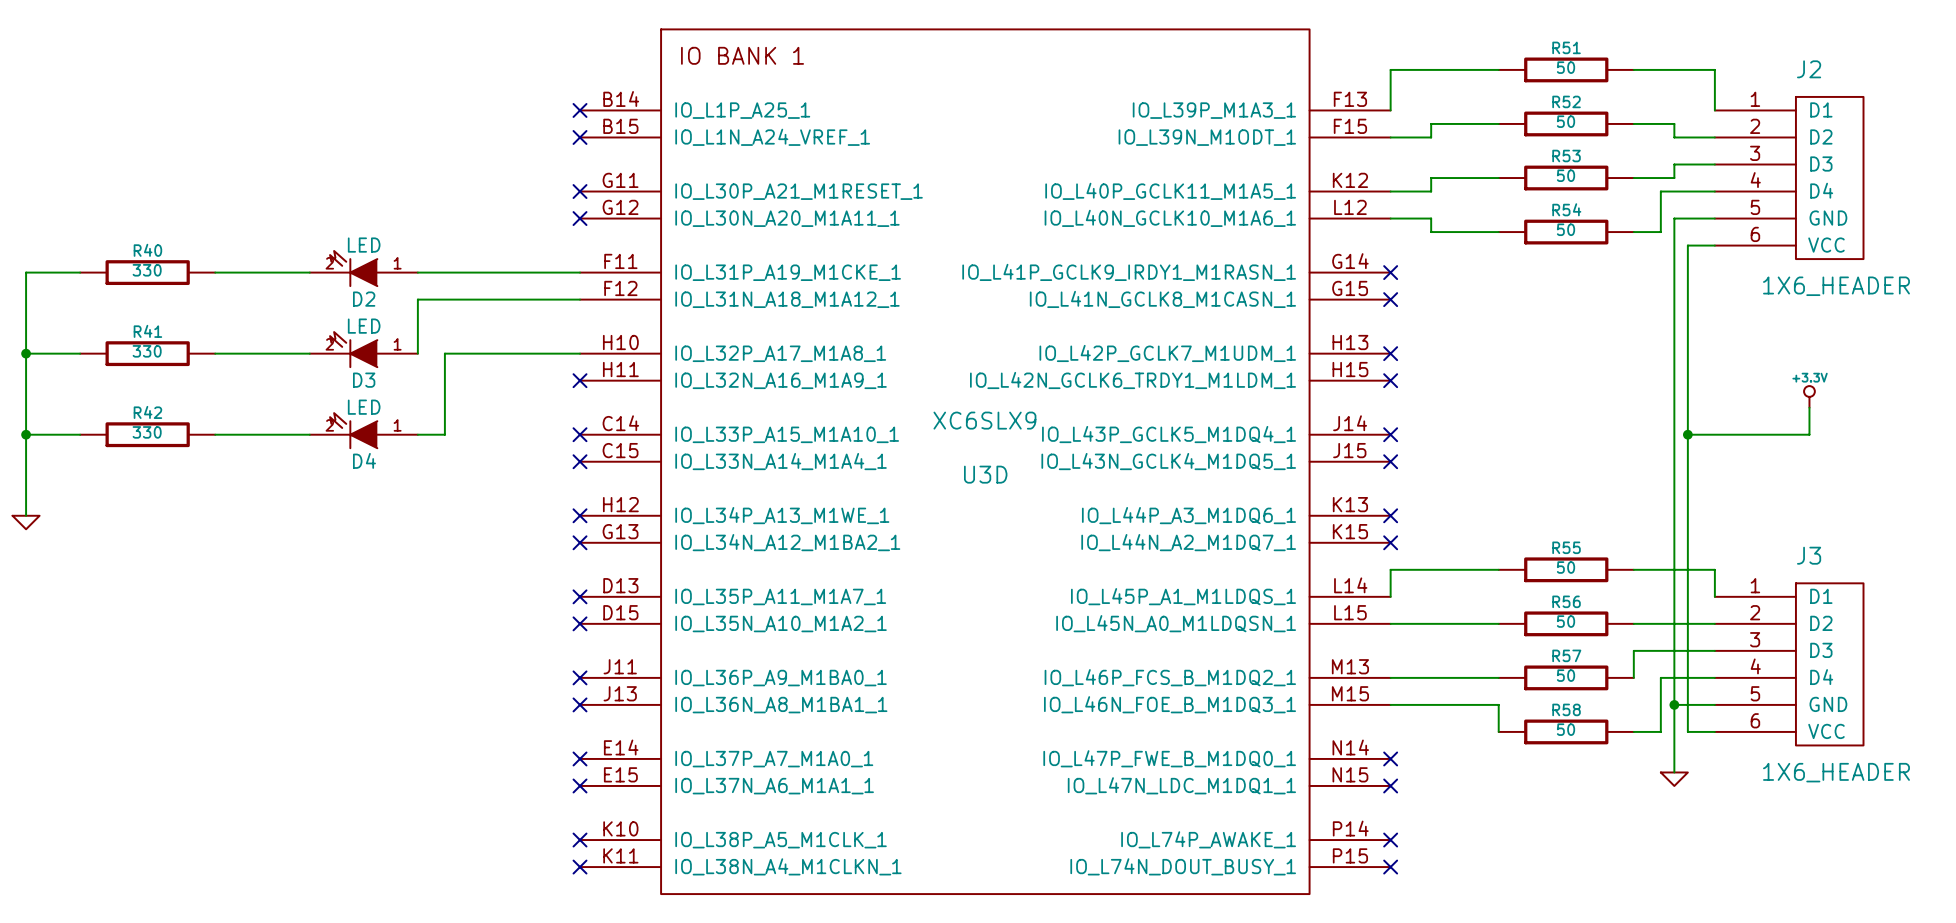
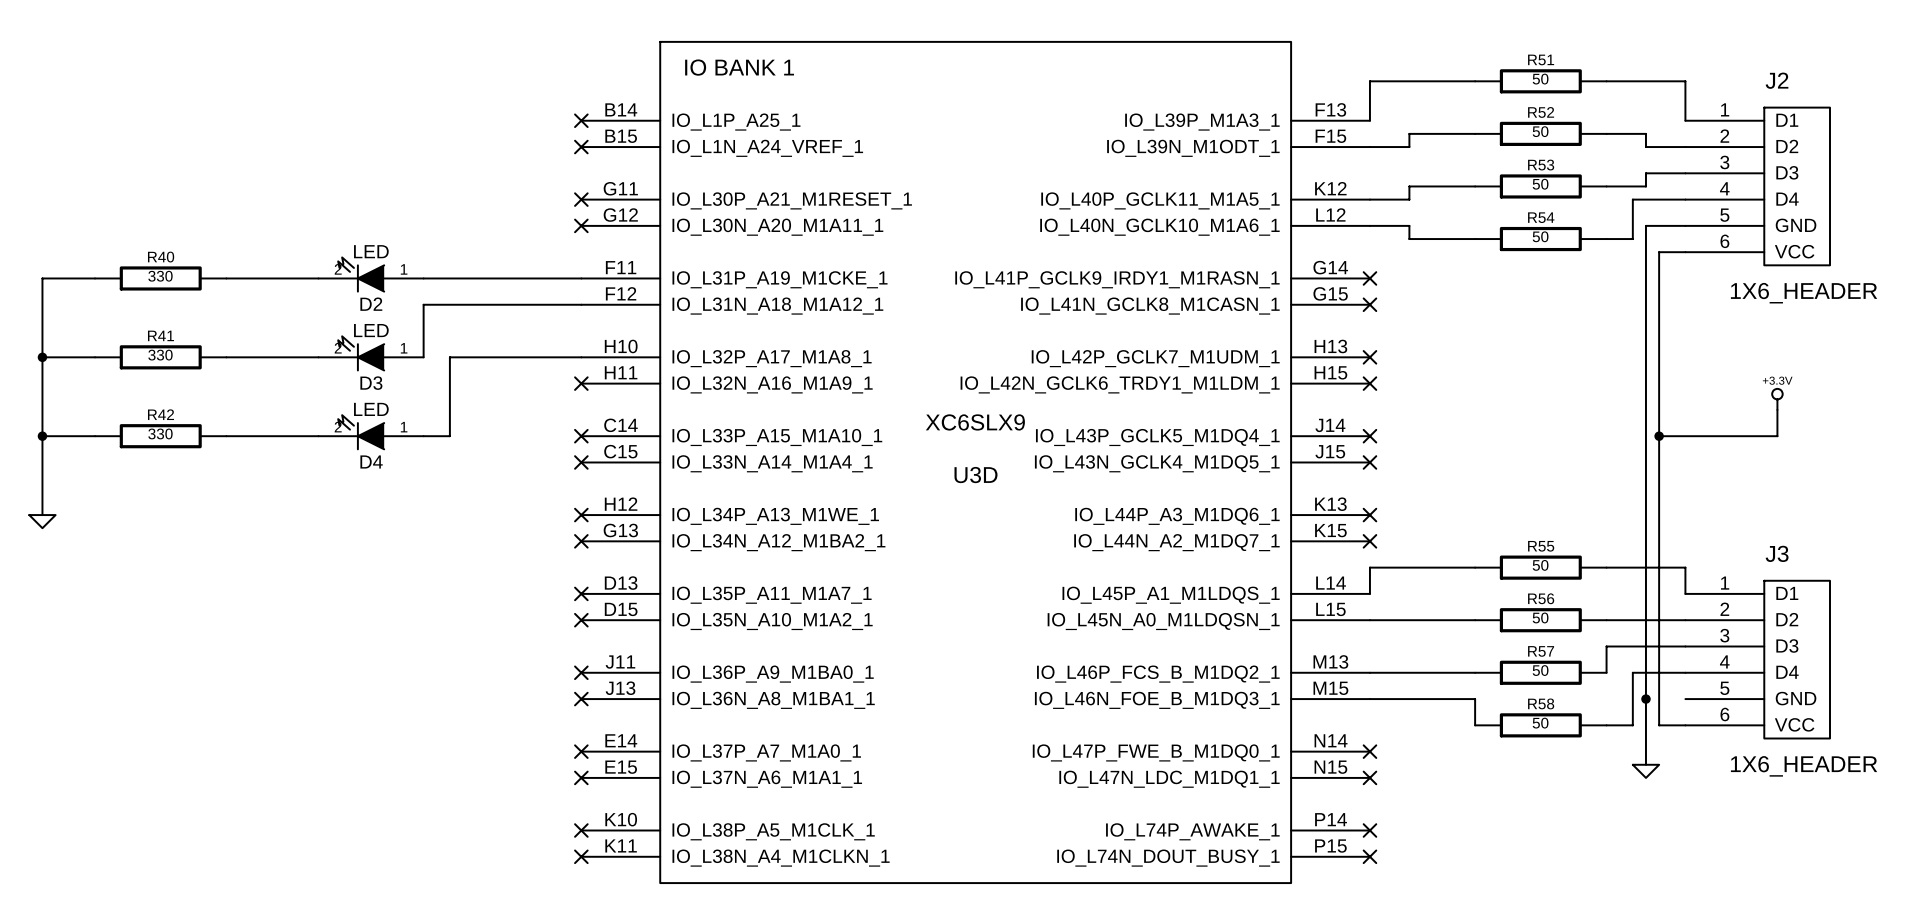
wire: (1674, 704) (1714, 704) -> none

